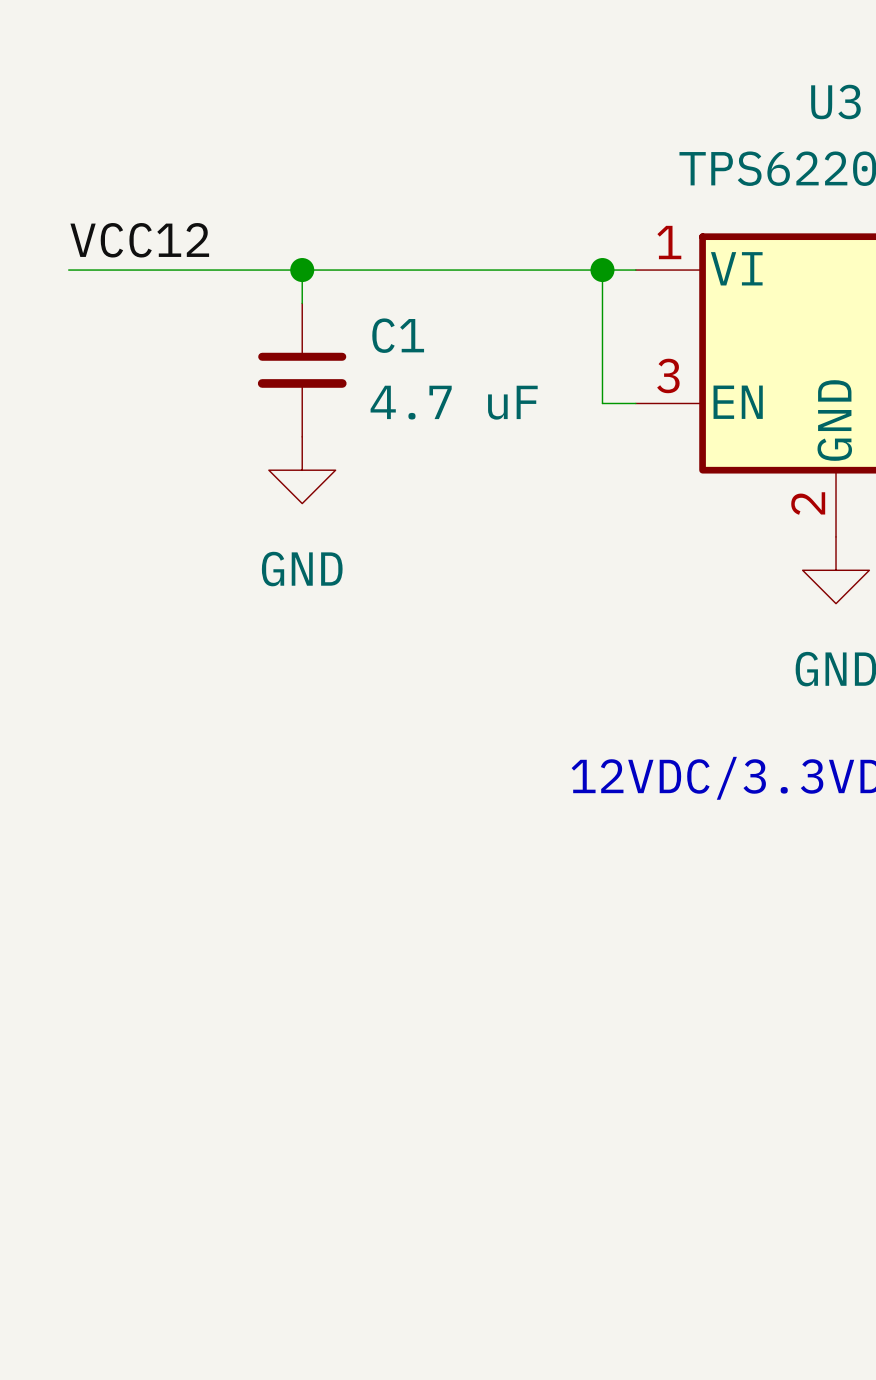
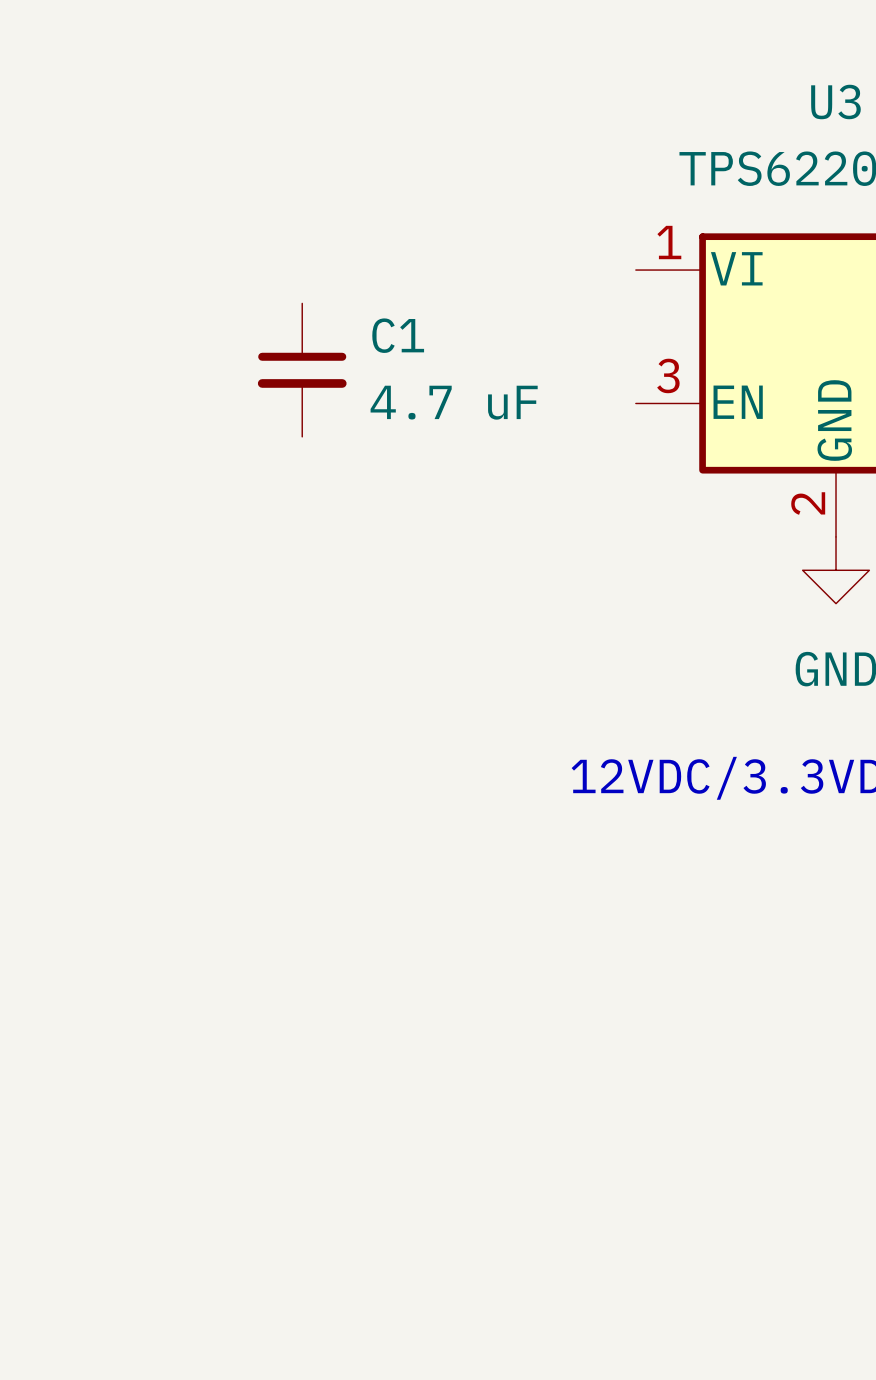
label: VCC12 (139, 240) -> none
wire: (68, 270) (635, 270) -> none
wire: (302, 270) (302, 303) -> none
junction: (302, 270) -> none
wire: (602, 270) (602, 403) (635, 403) -> none
junction: (602, 270) -> none
power symbol: GND (302, 470) -> none

